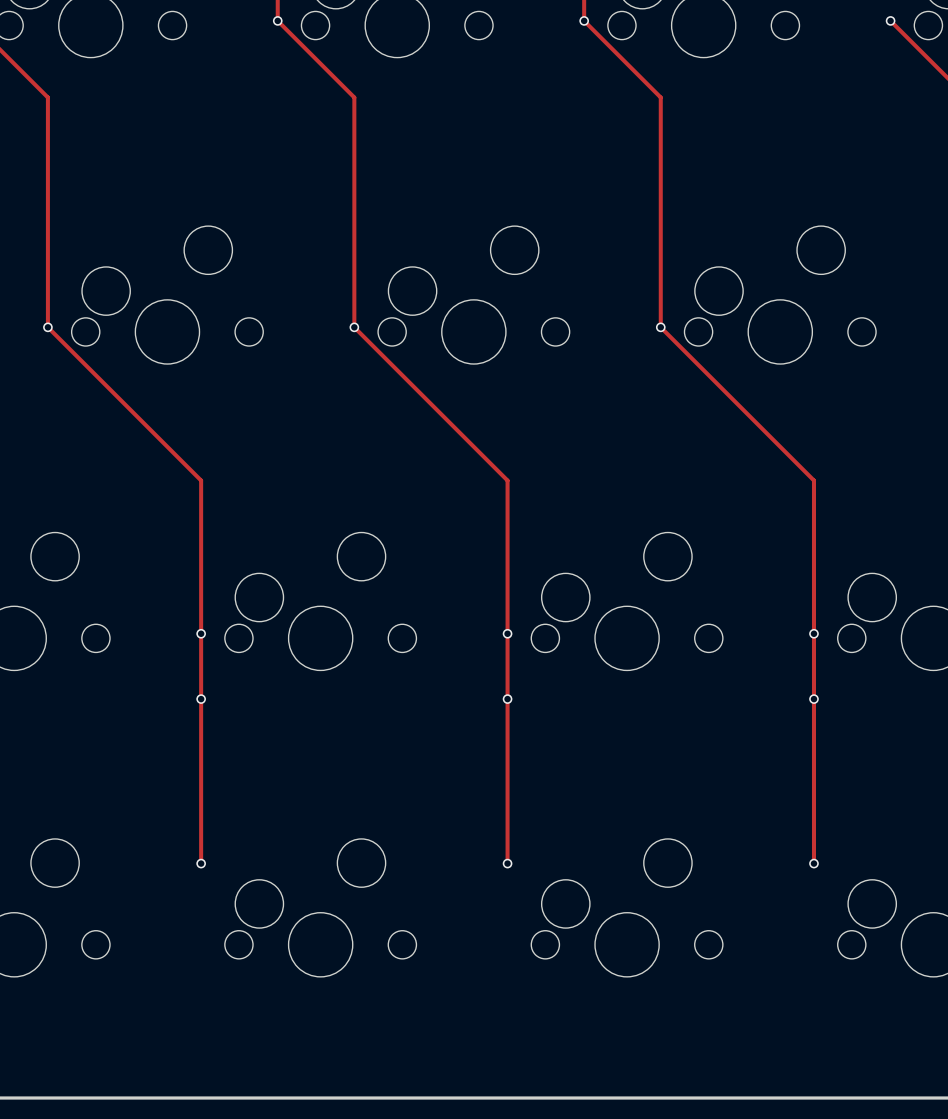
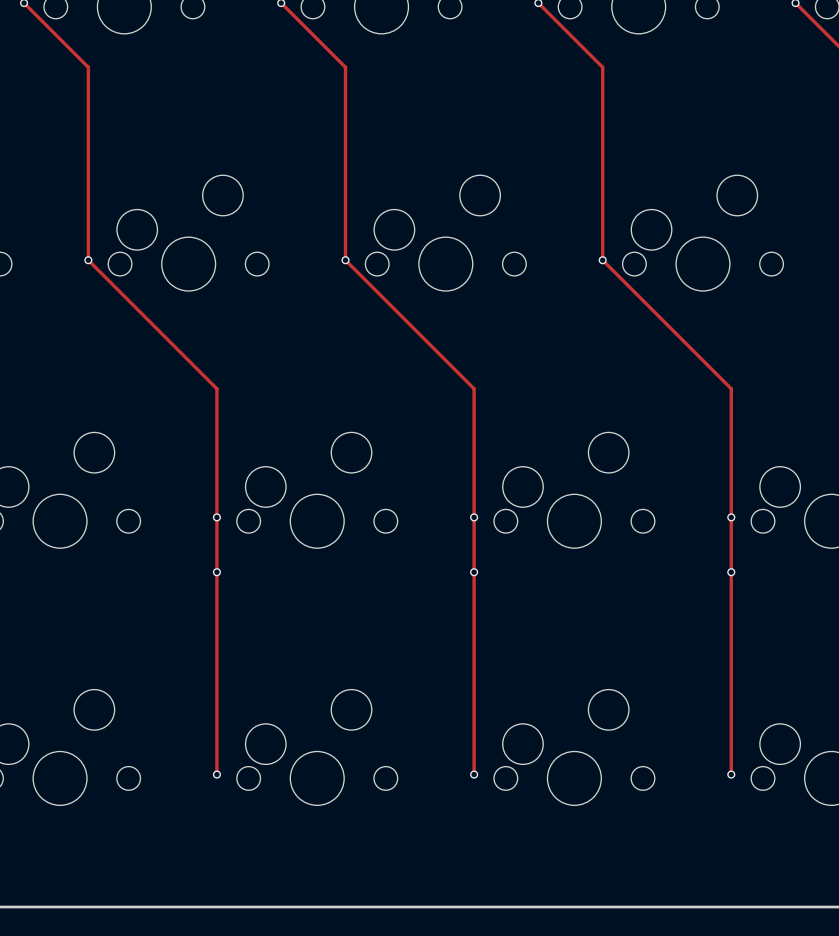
track: none -> (216, 710) (216, 774)
via position: (201, 863) -> (216, 774)
track: none -> (474, 710) (474, 774)
via position: (507, 863) -> (474, 774)
track: none -> (731, 710) (731, 774)
via position: (813, 863) -> (731, 774)

